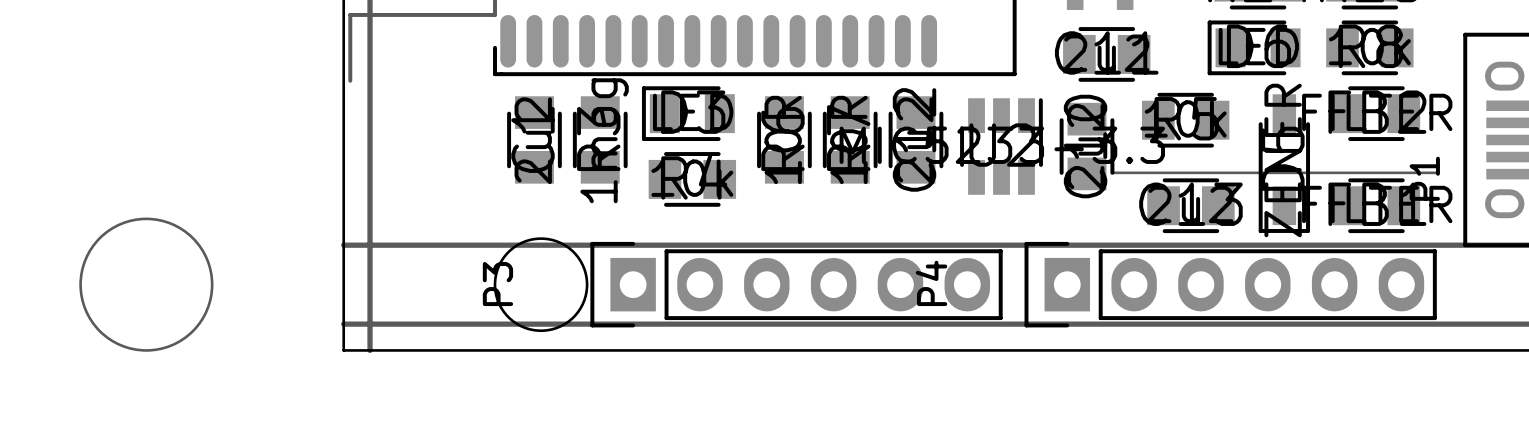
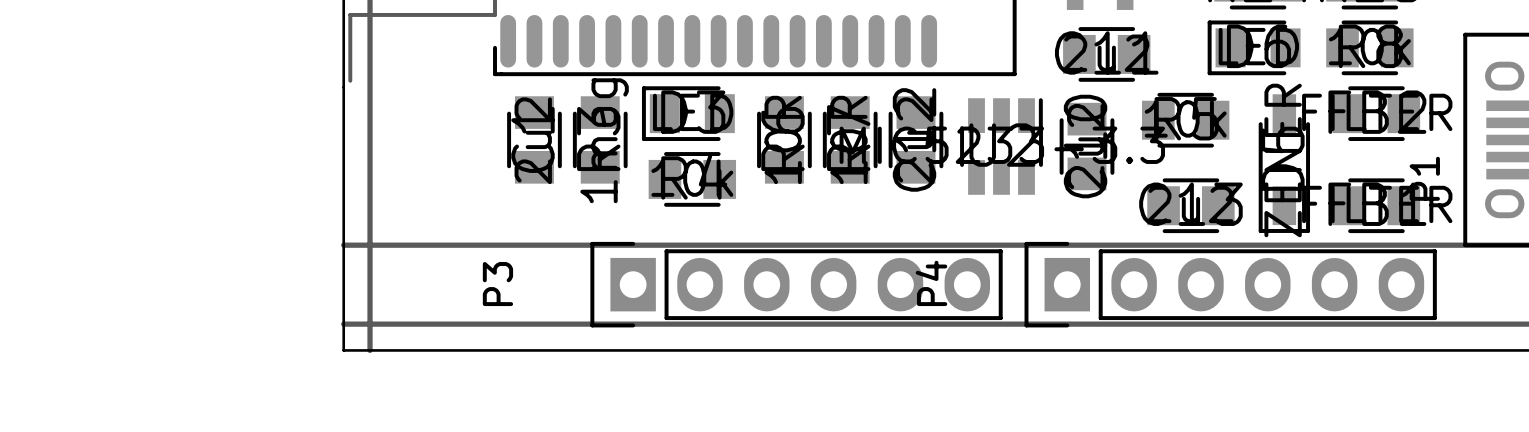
line: (1113, 172) (1435, 172) -> none
drawing: [79, 217, 214, 352] -> none
round board edge: [493, 237, 589, 333] -> none

